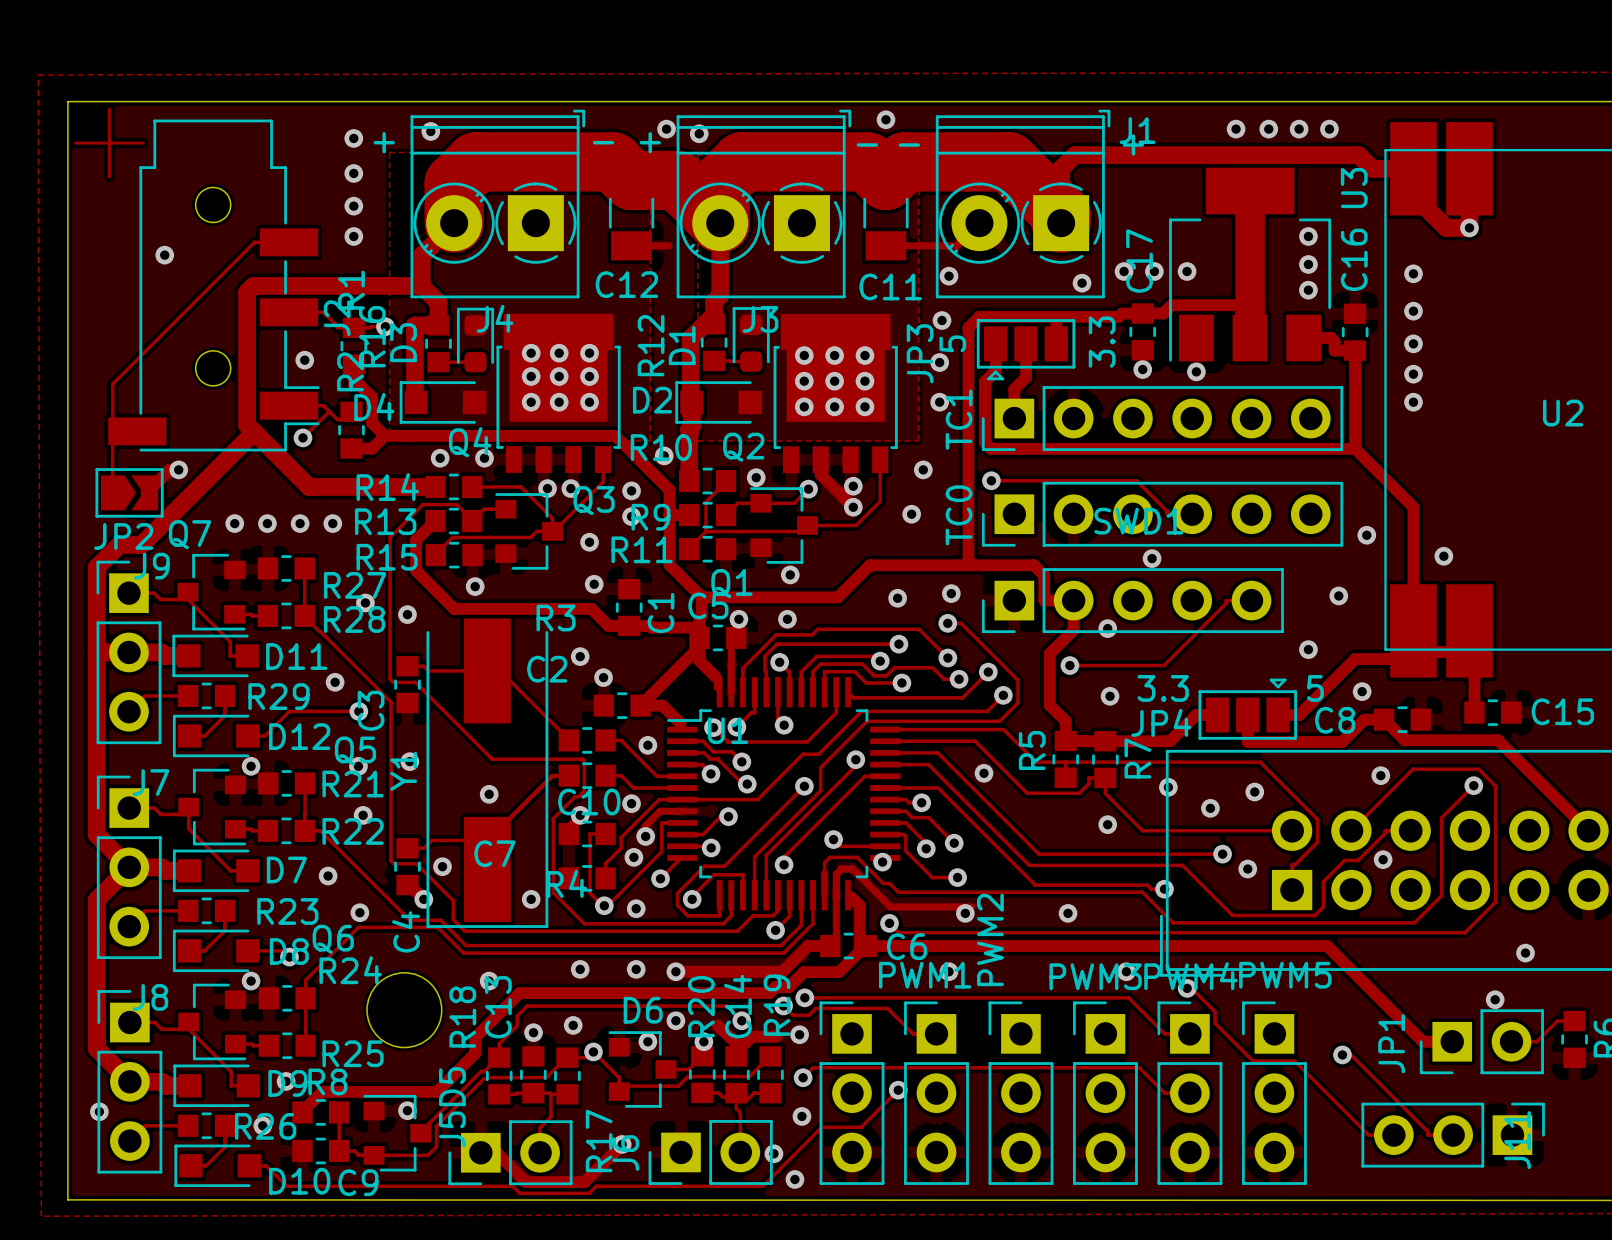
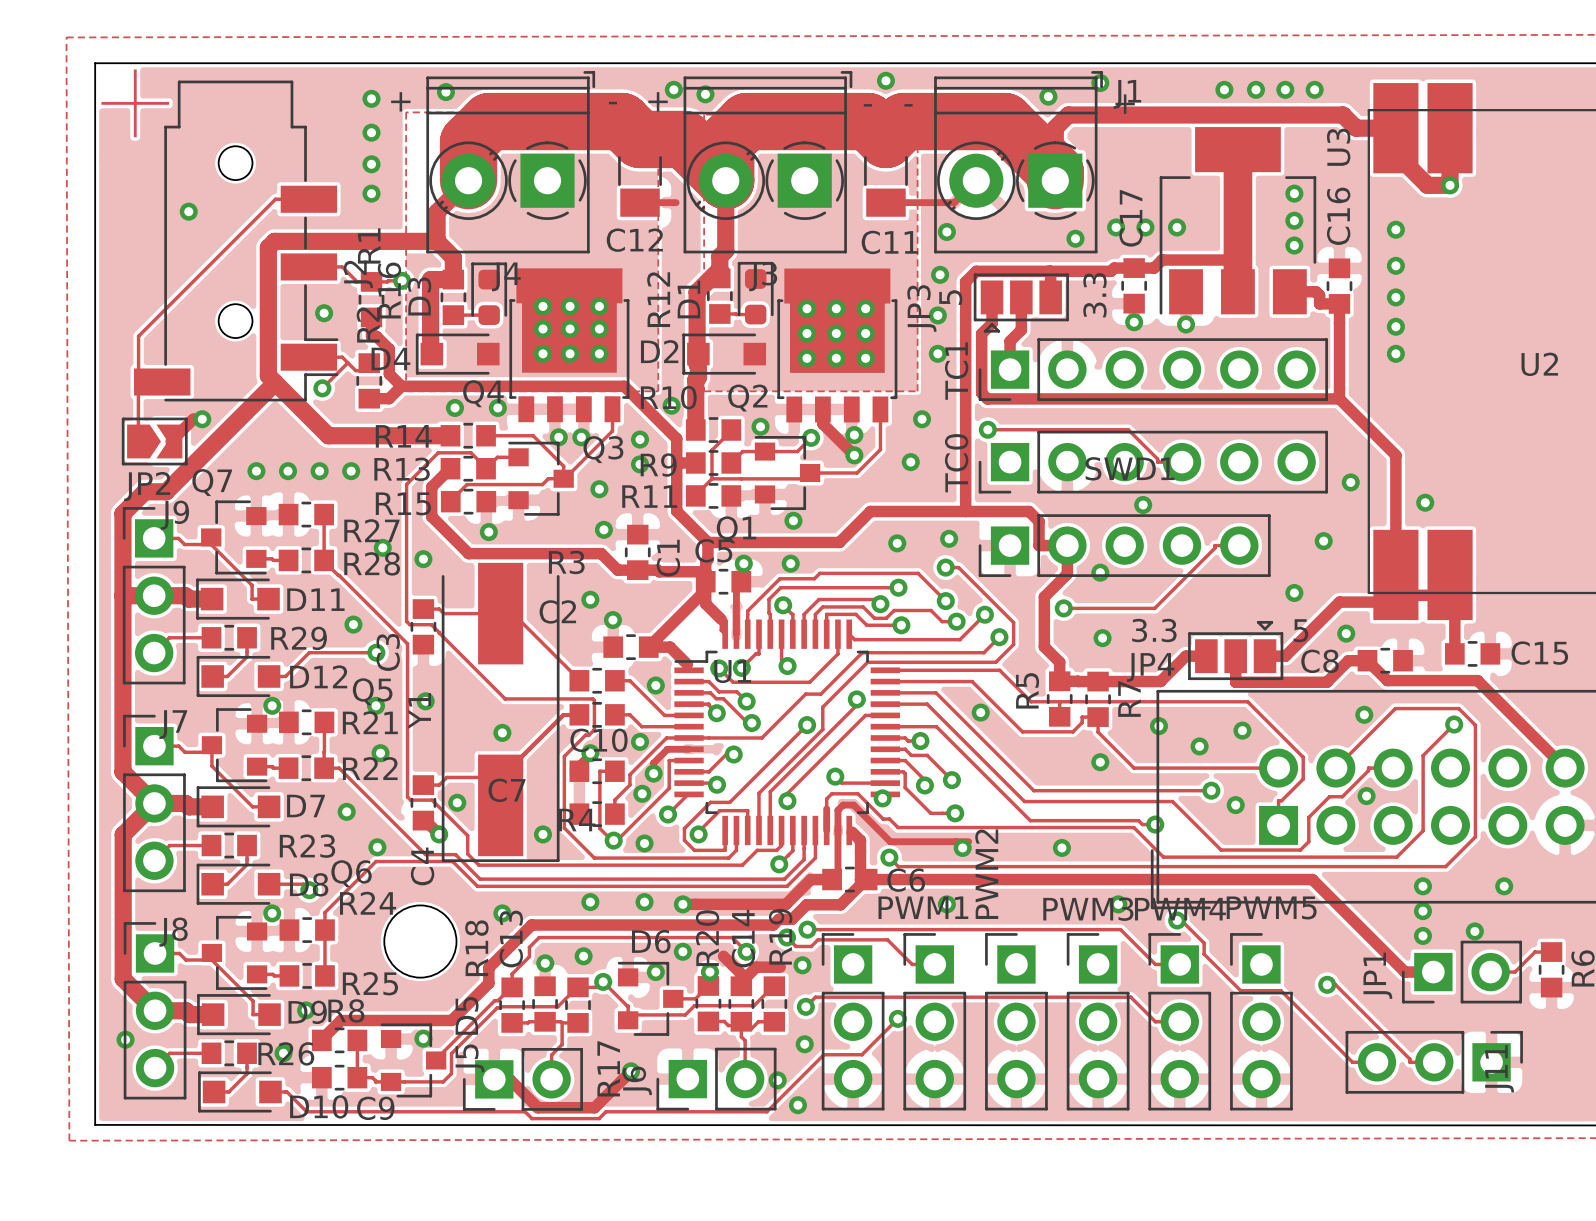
via: none -> (1100, 83)
via: none -> (1048, 96)
via: none -> (1422, 886)
via: none -> (1422, 911)
via: none -> (1422, 935)

